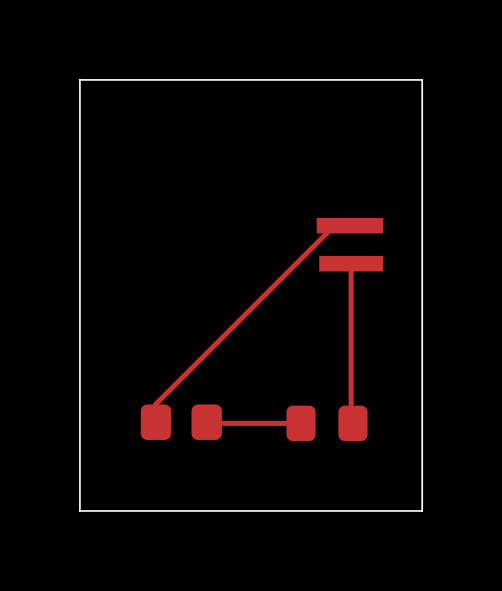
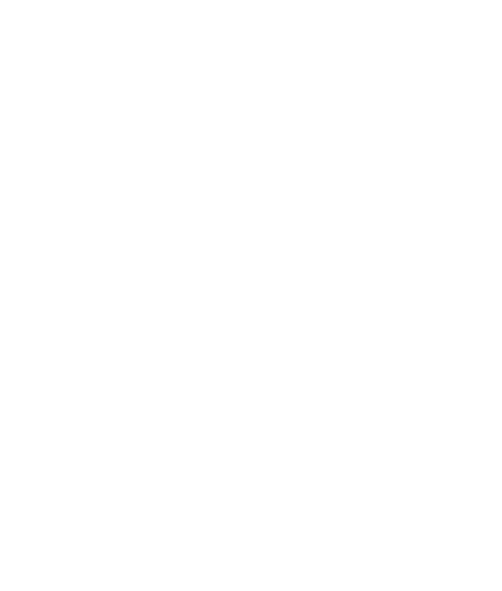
board edge: (422, 79) (79, 79) (79, 510) (422, 510) (422, 79) -> none
top track: (349, 225) (334, 225) (155, 404) (155, 422) -> none
part: (349, 244) -> none
top track: (351, 263) (351, 421) (353, 423) -> none
part: (181, 422) -> none
top track: (206, 422) (301, 423) -> none
part: (327, 423) -> none

